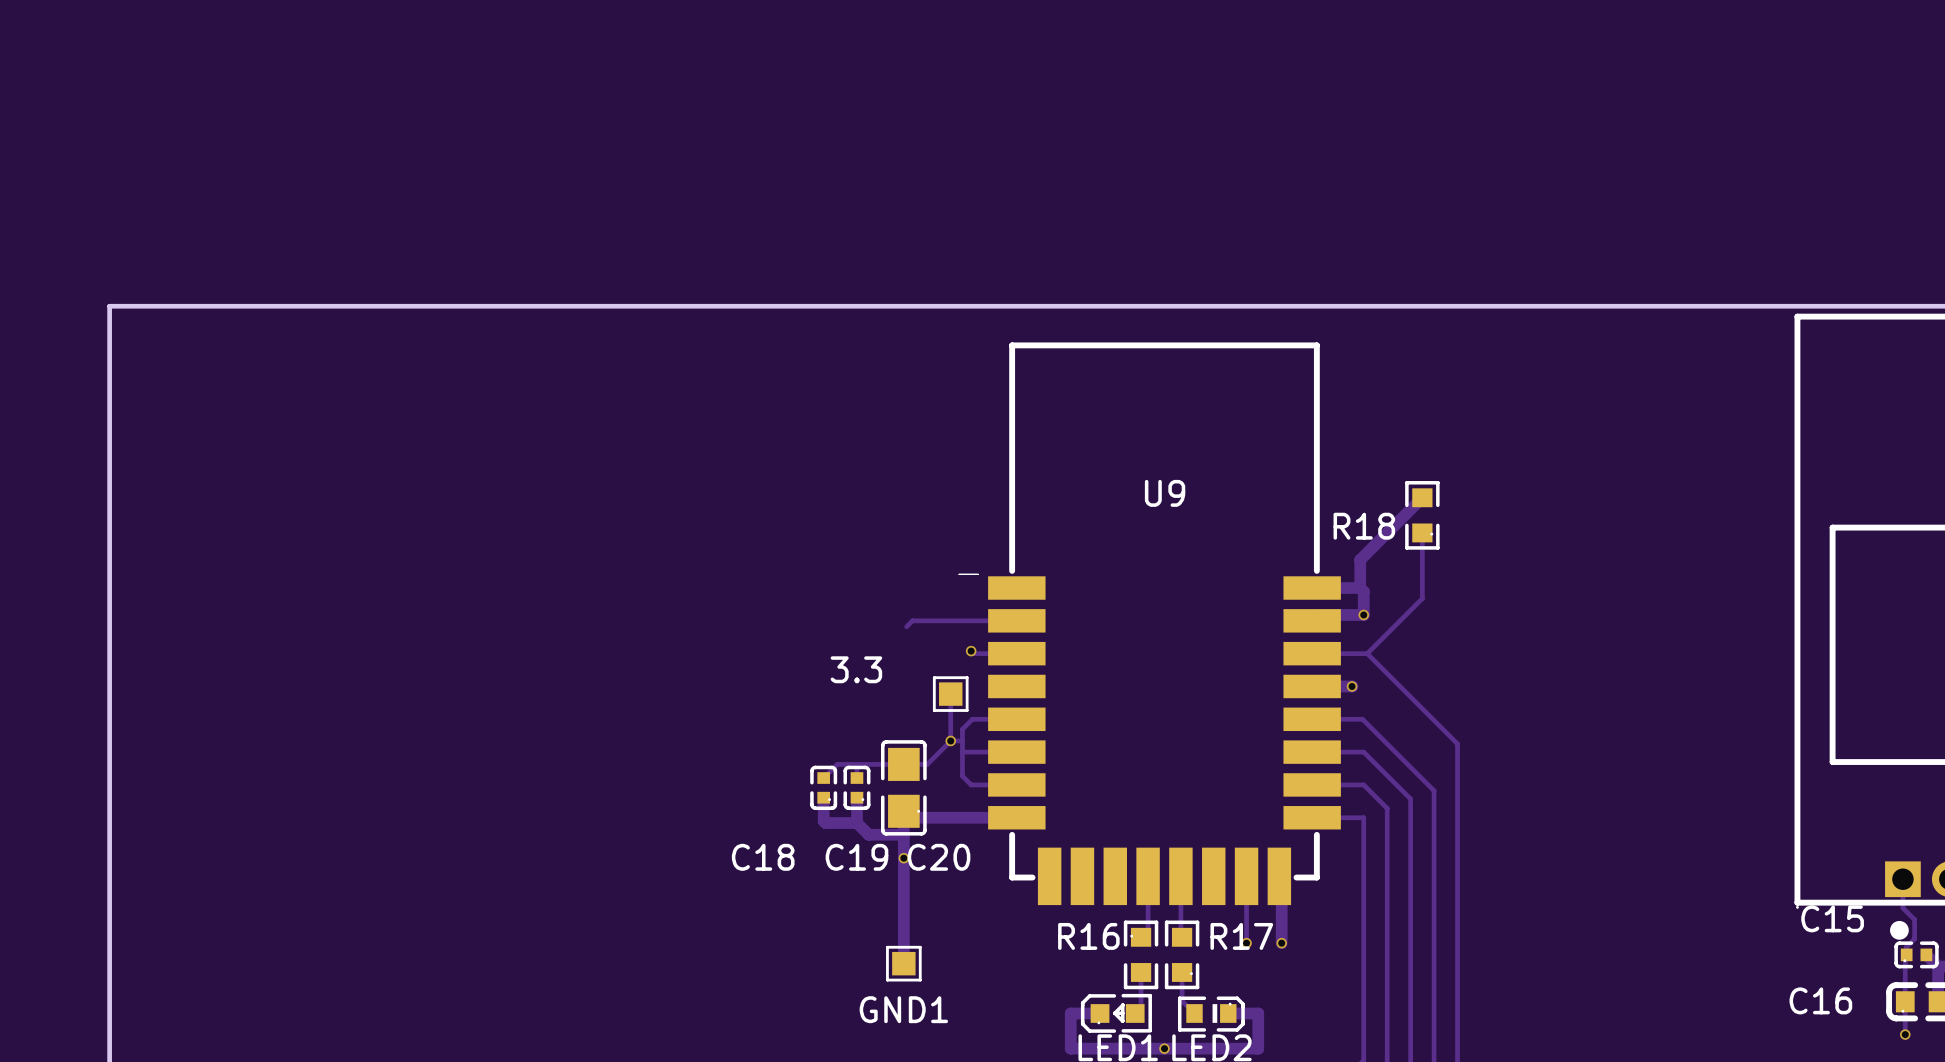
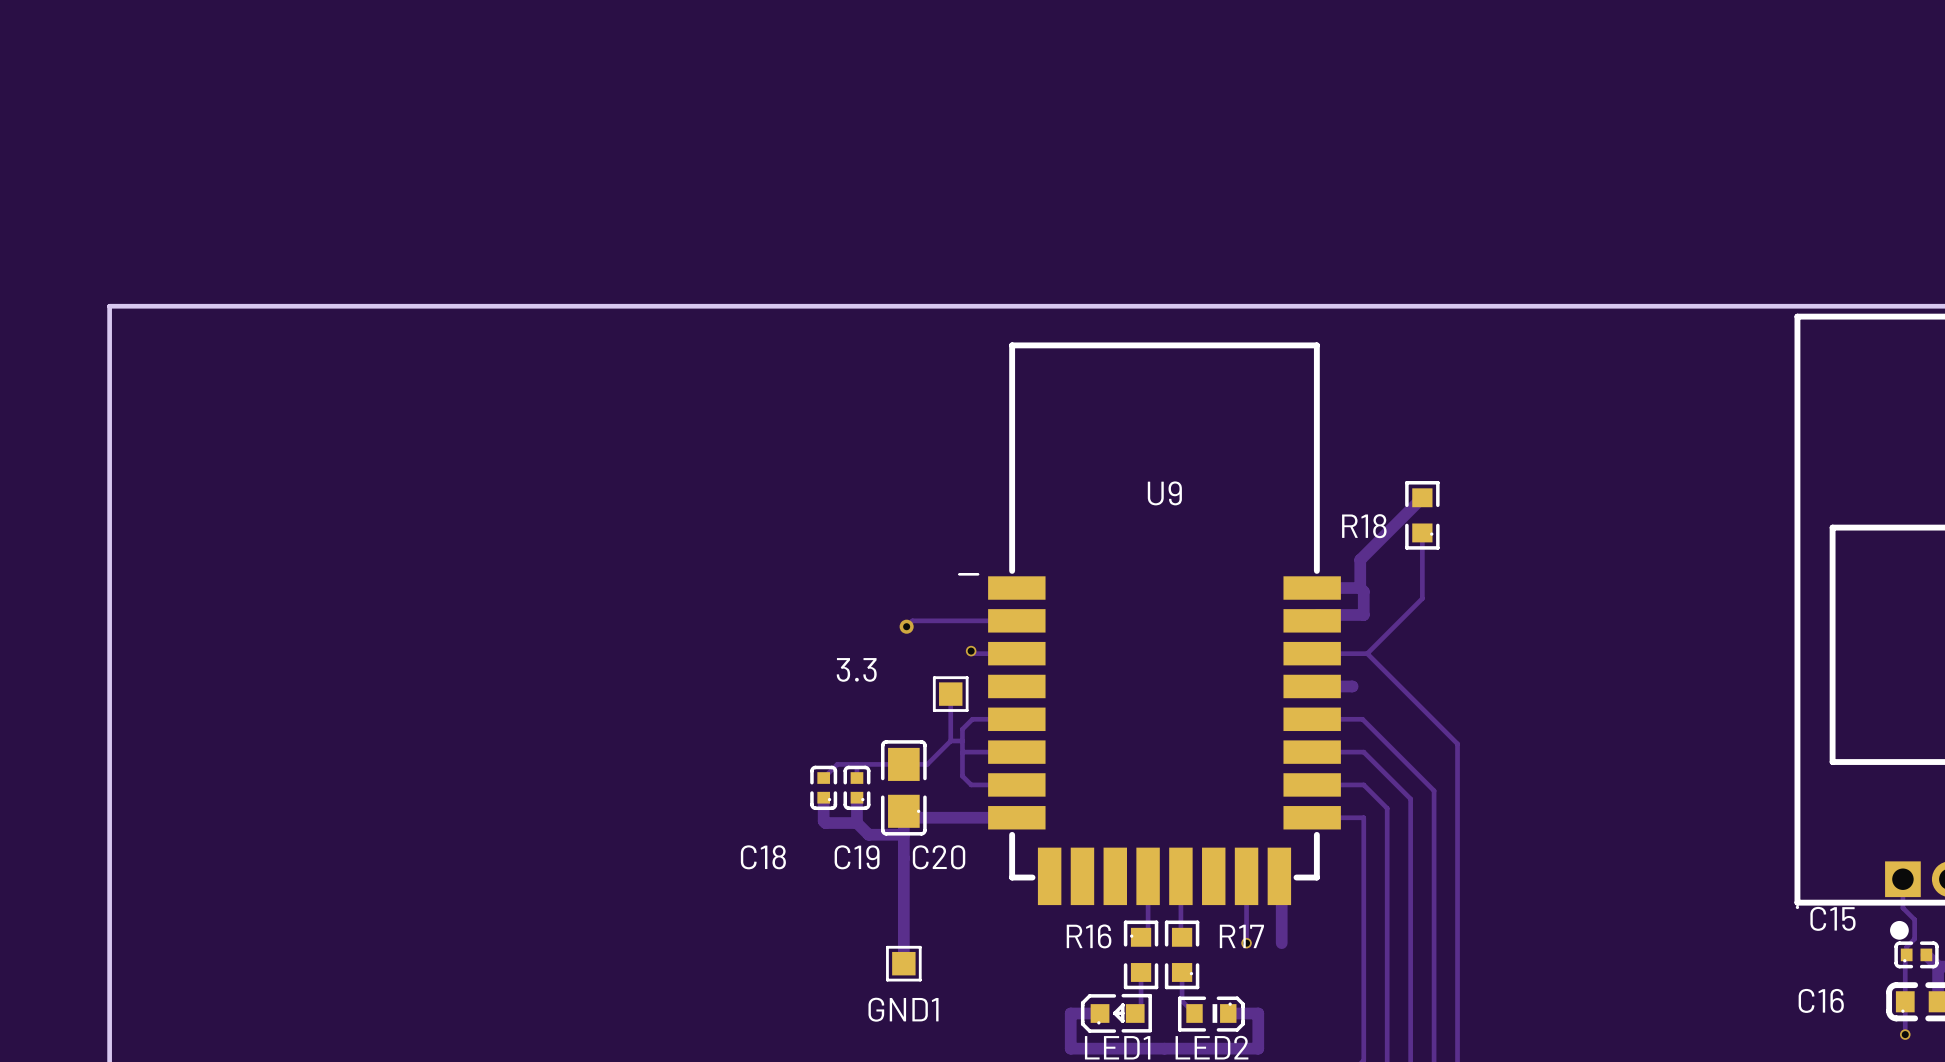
via: (1363, 614) -> none
via: none -> (906, 626)
via: (1352, 686) -> none
via: (950, 740) -> none
via: (903, 858) -> none
via: (1281, 943) -> none
via: (1164, 1048) -> none

